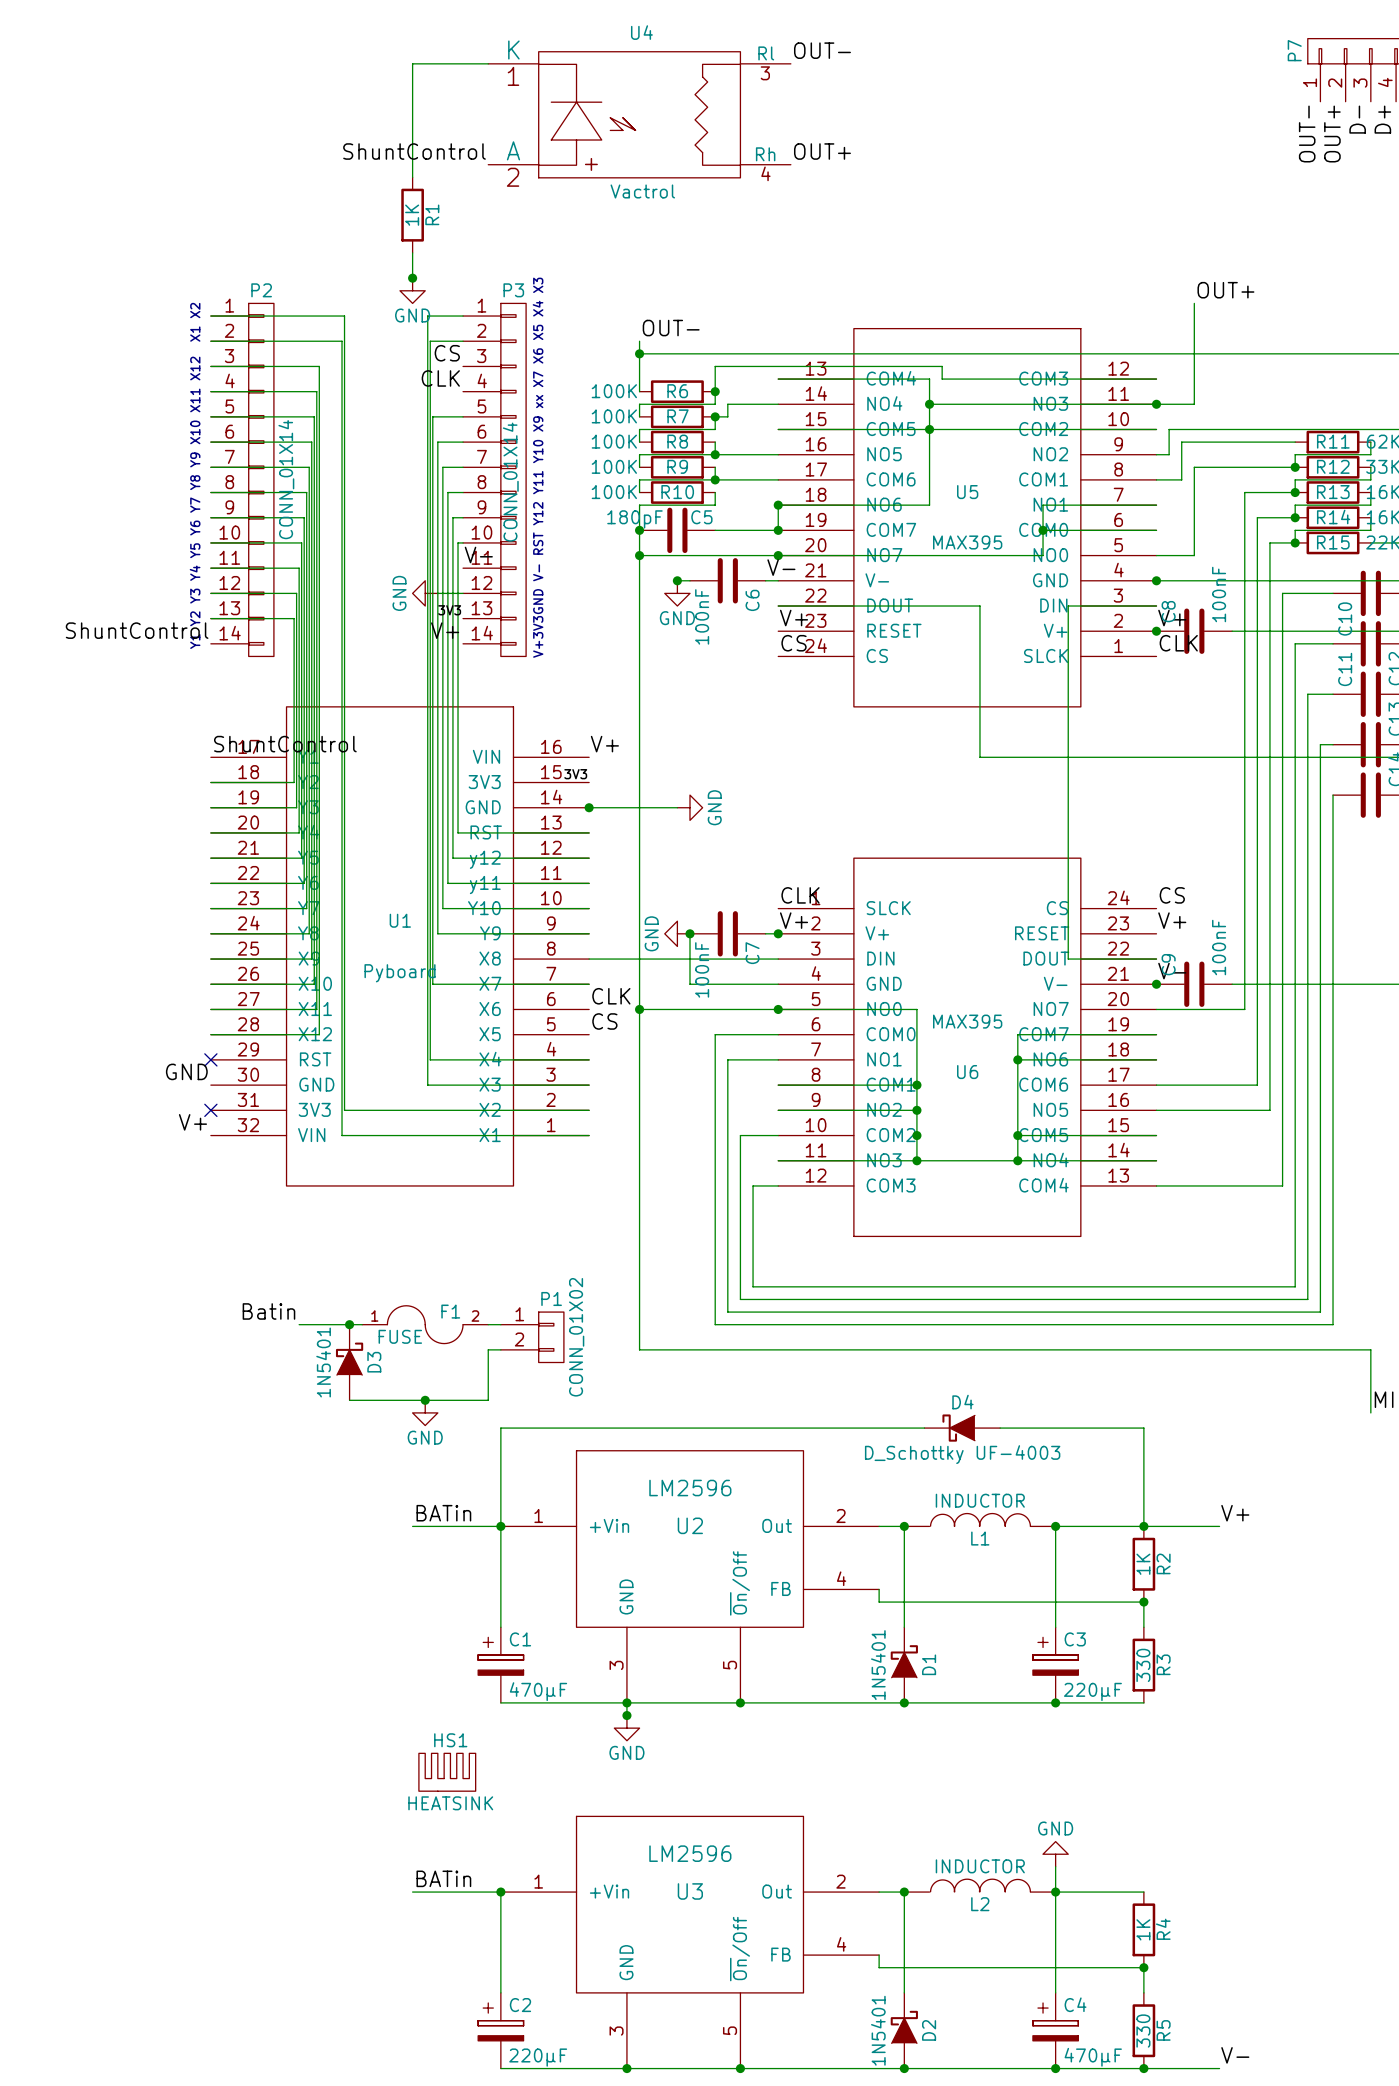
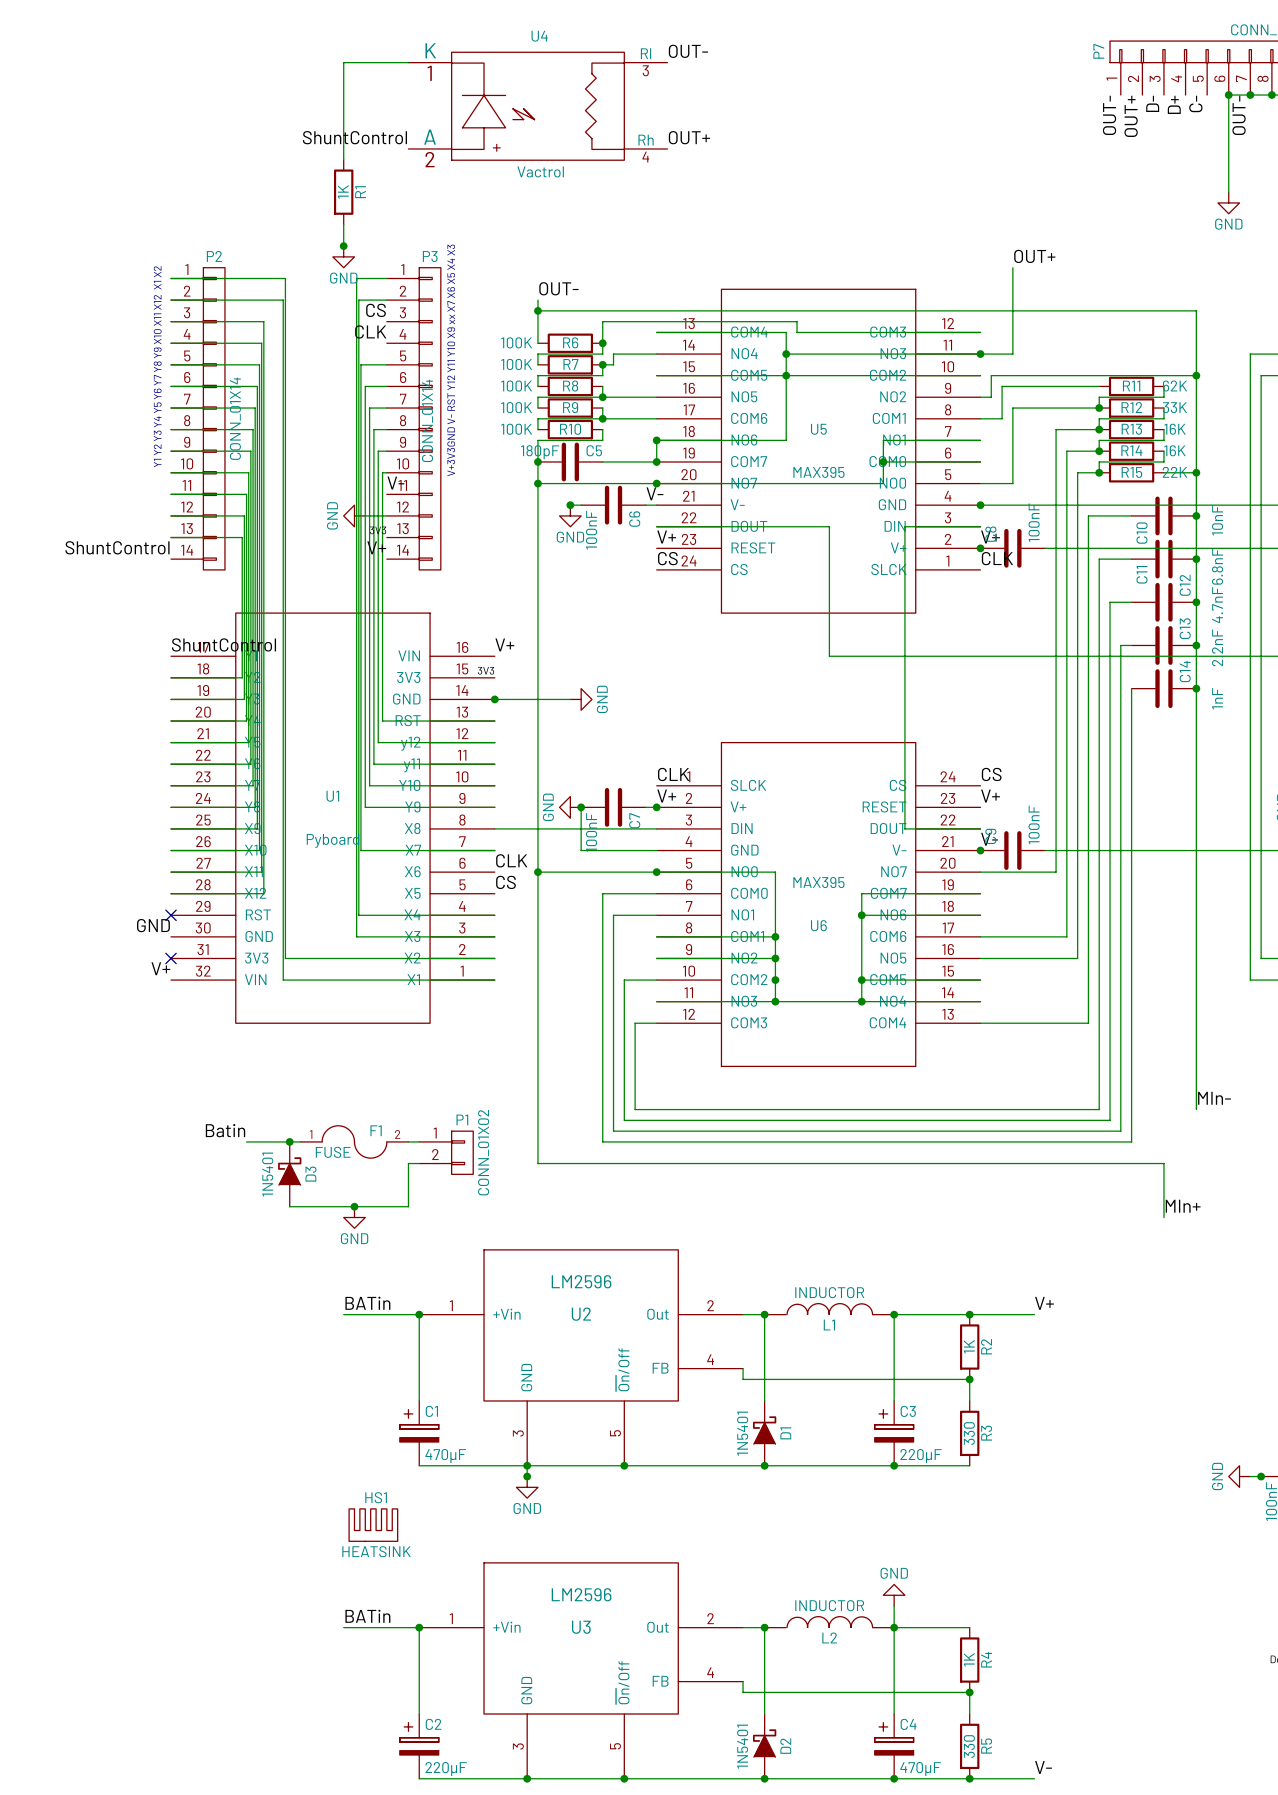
wire: (924, 1428) (500, 1428) (500, 1526) -> none
D4: D_Schottky UF-4003 (962, 1428) -> none
wire: (1000, 1428) (1143, 1428) (1143, 1526) -> none

